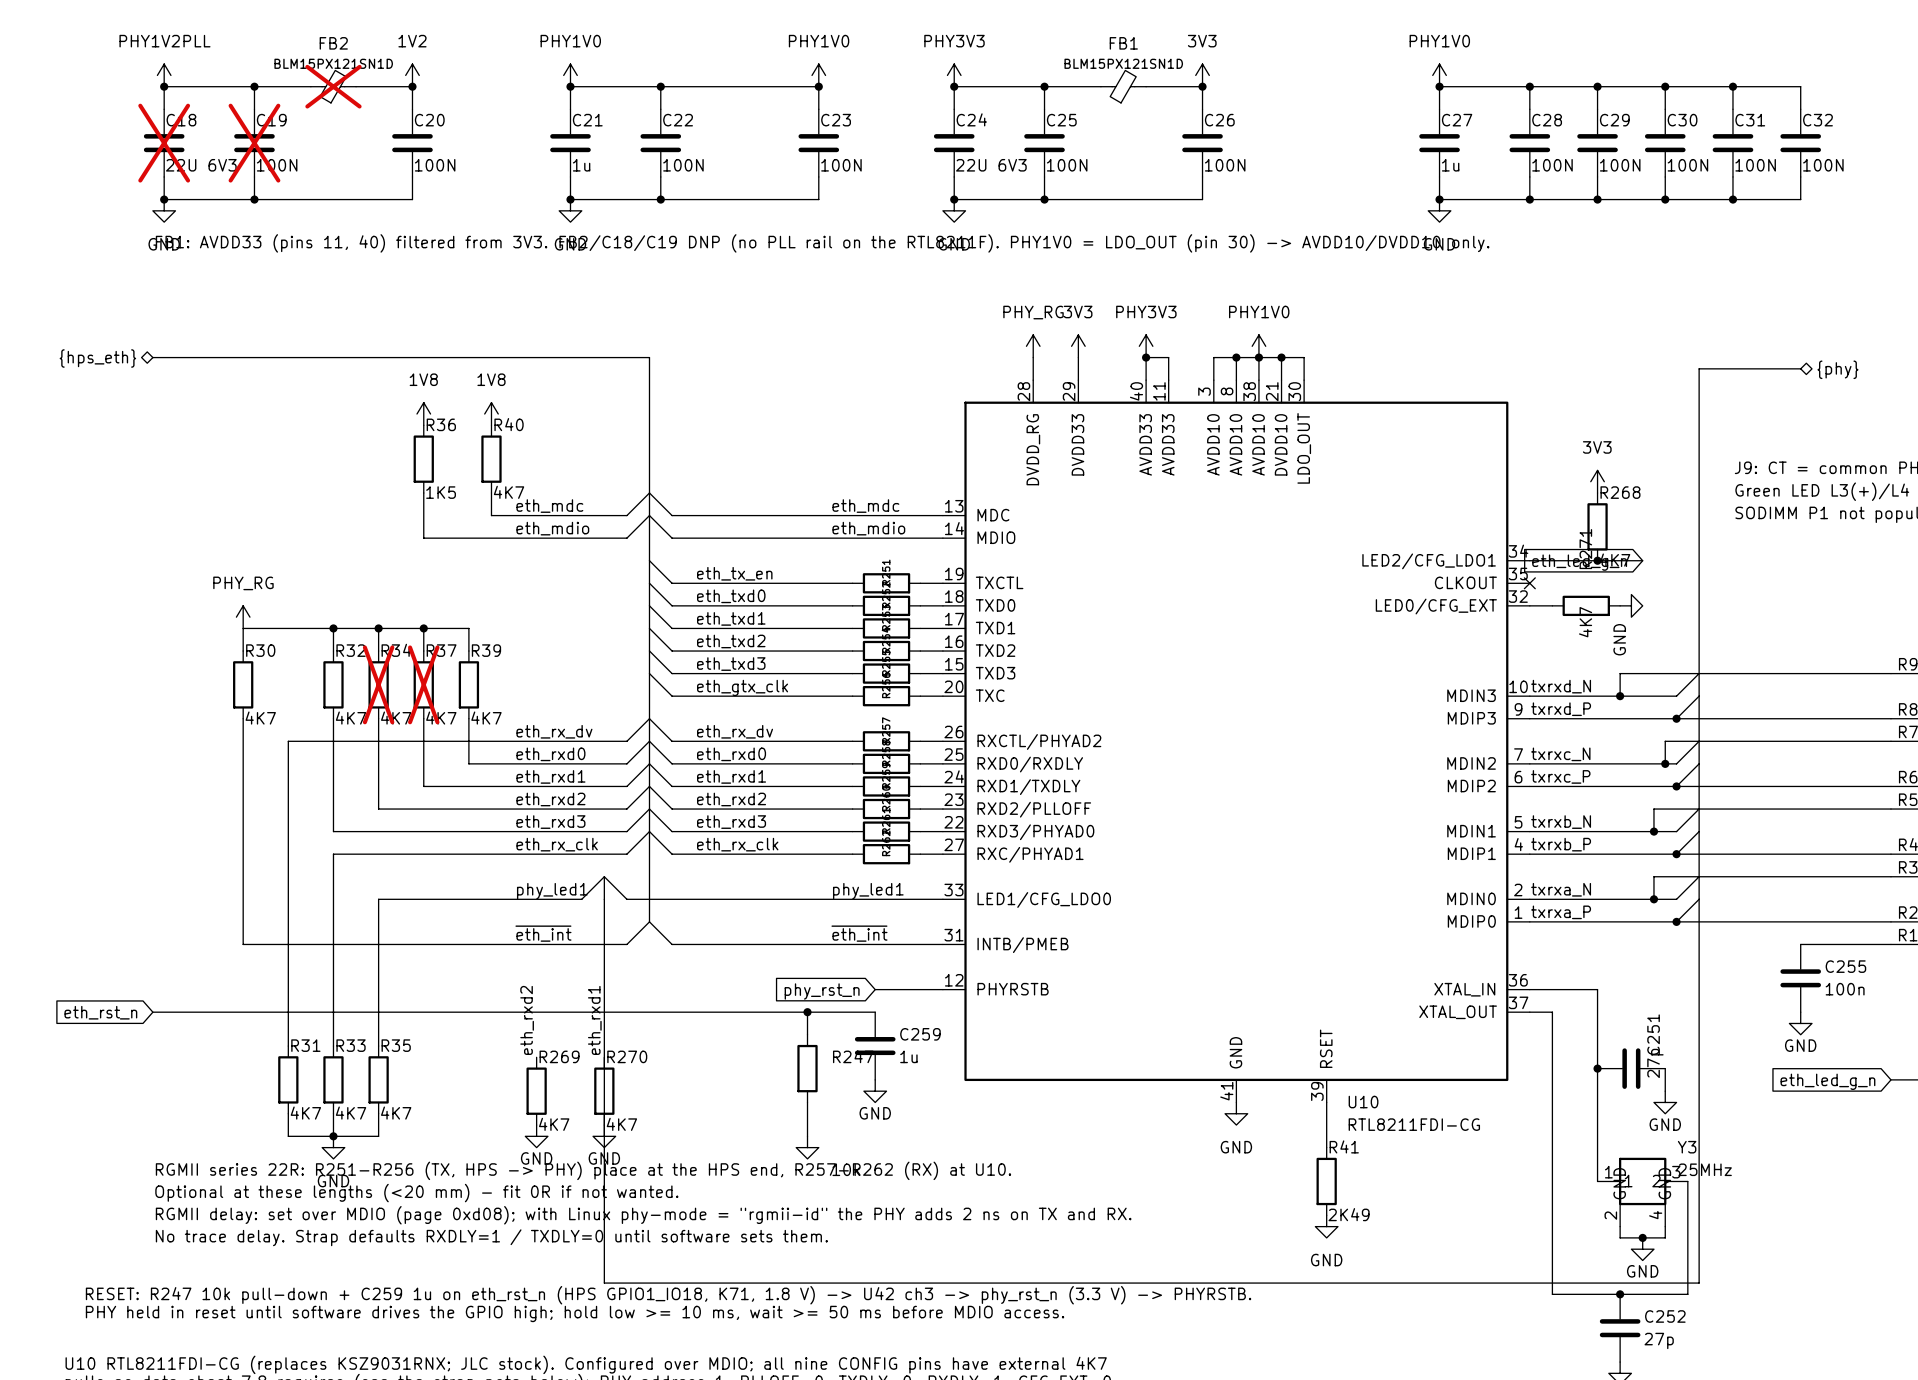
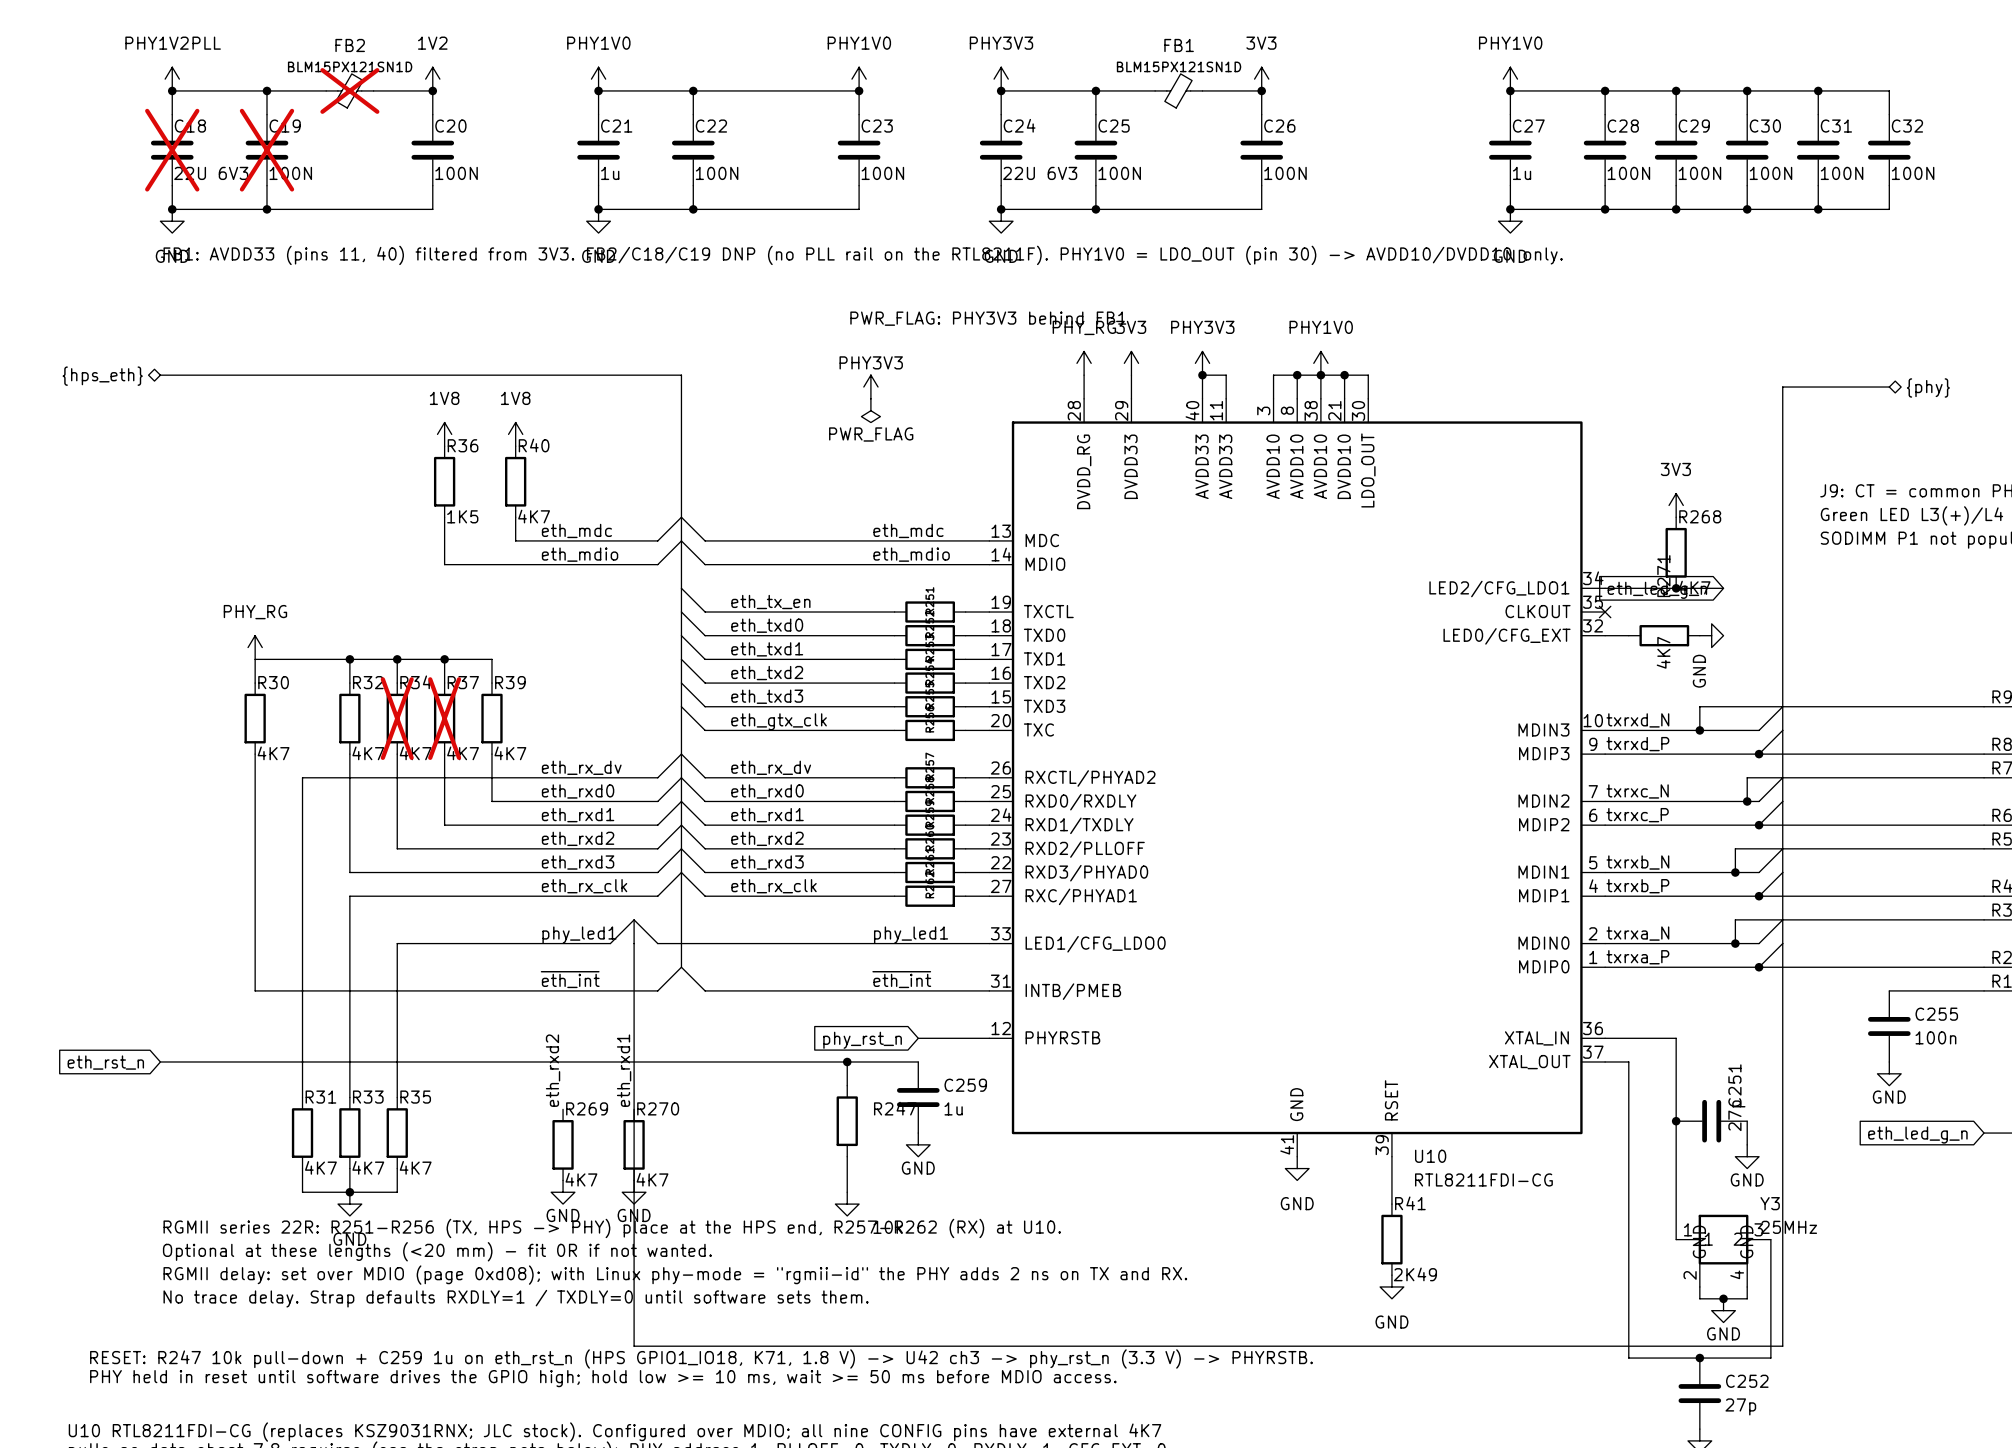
text: none -> PWR_FLAG: PHY3V3 behind FB1 (988, 318)
power symbol: none -> PHY3V3 (870, 387)
power symbol: none -> PWR_FLAG (870, 410)

